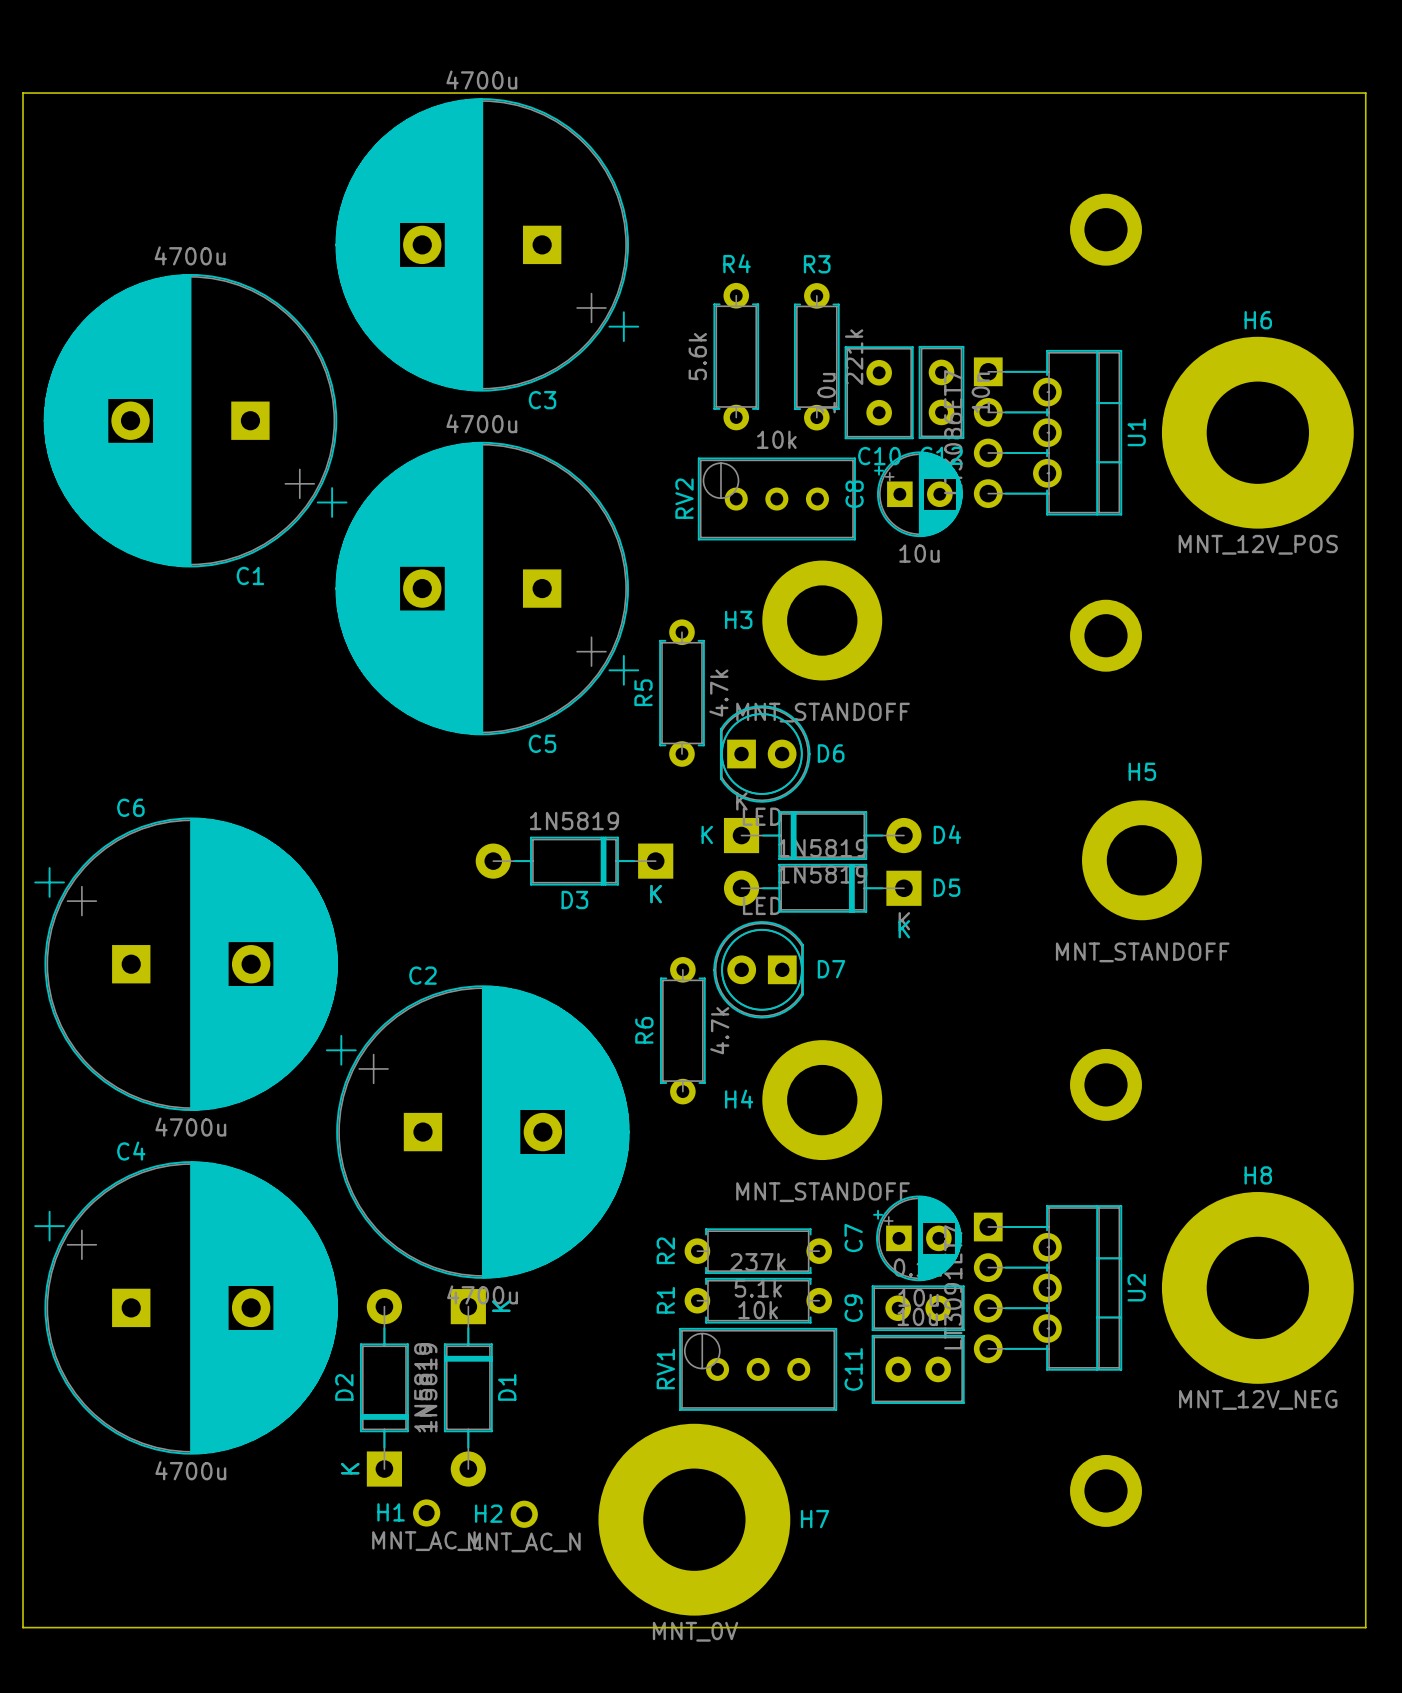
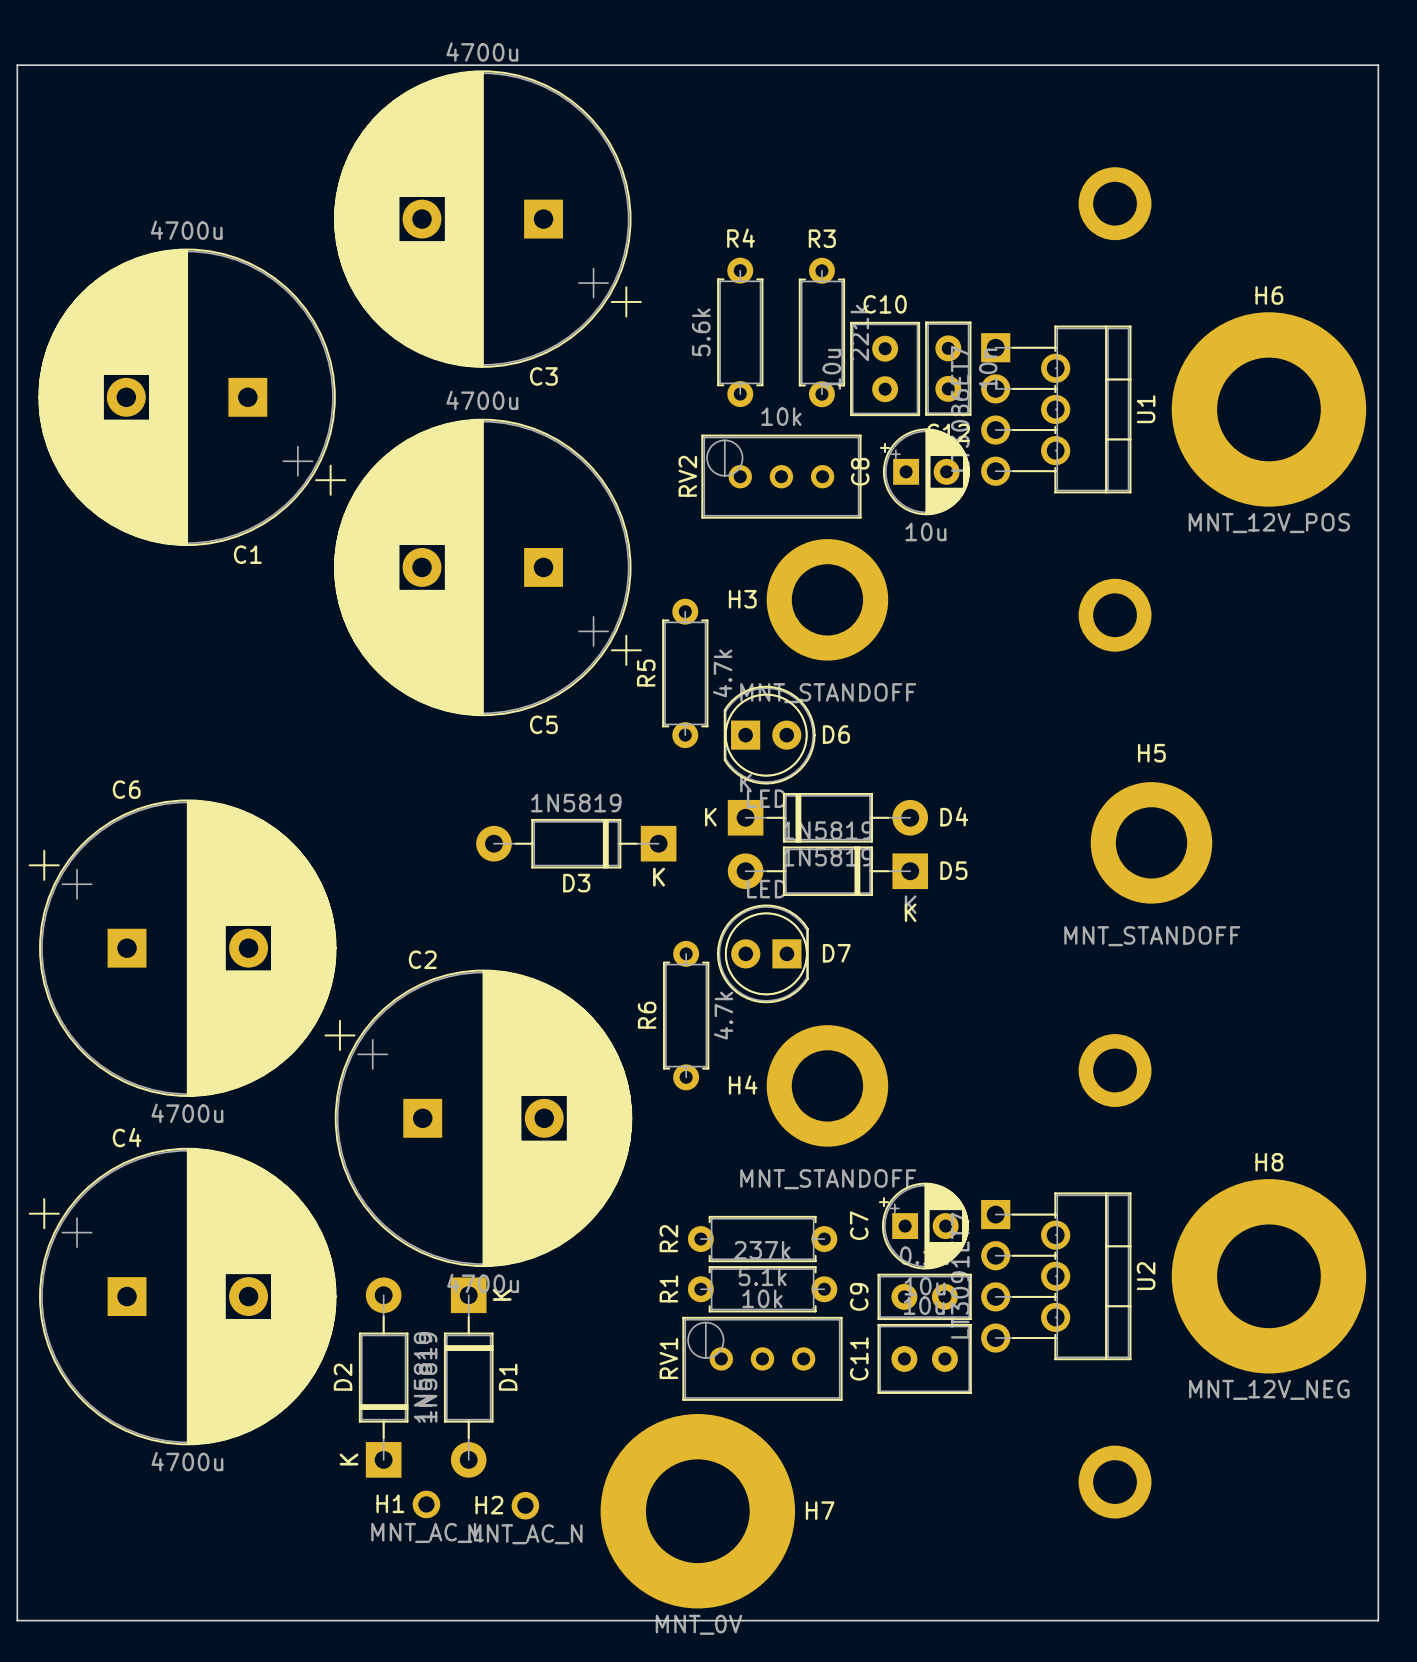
C10 name position: C10 (879, 456) -> C10 (885, 304)

